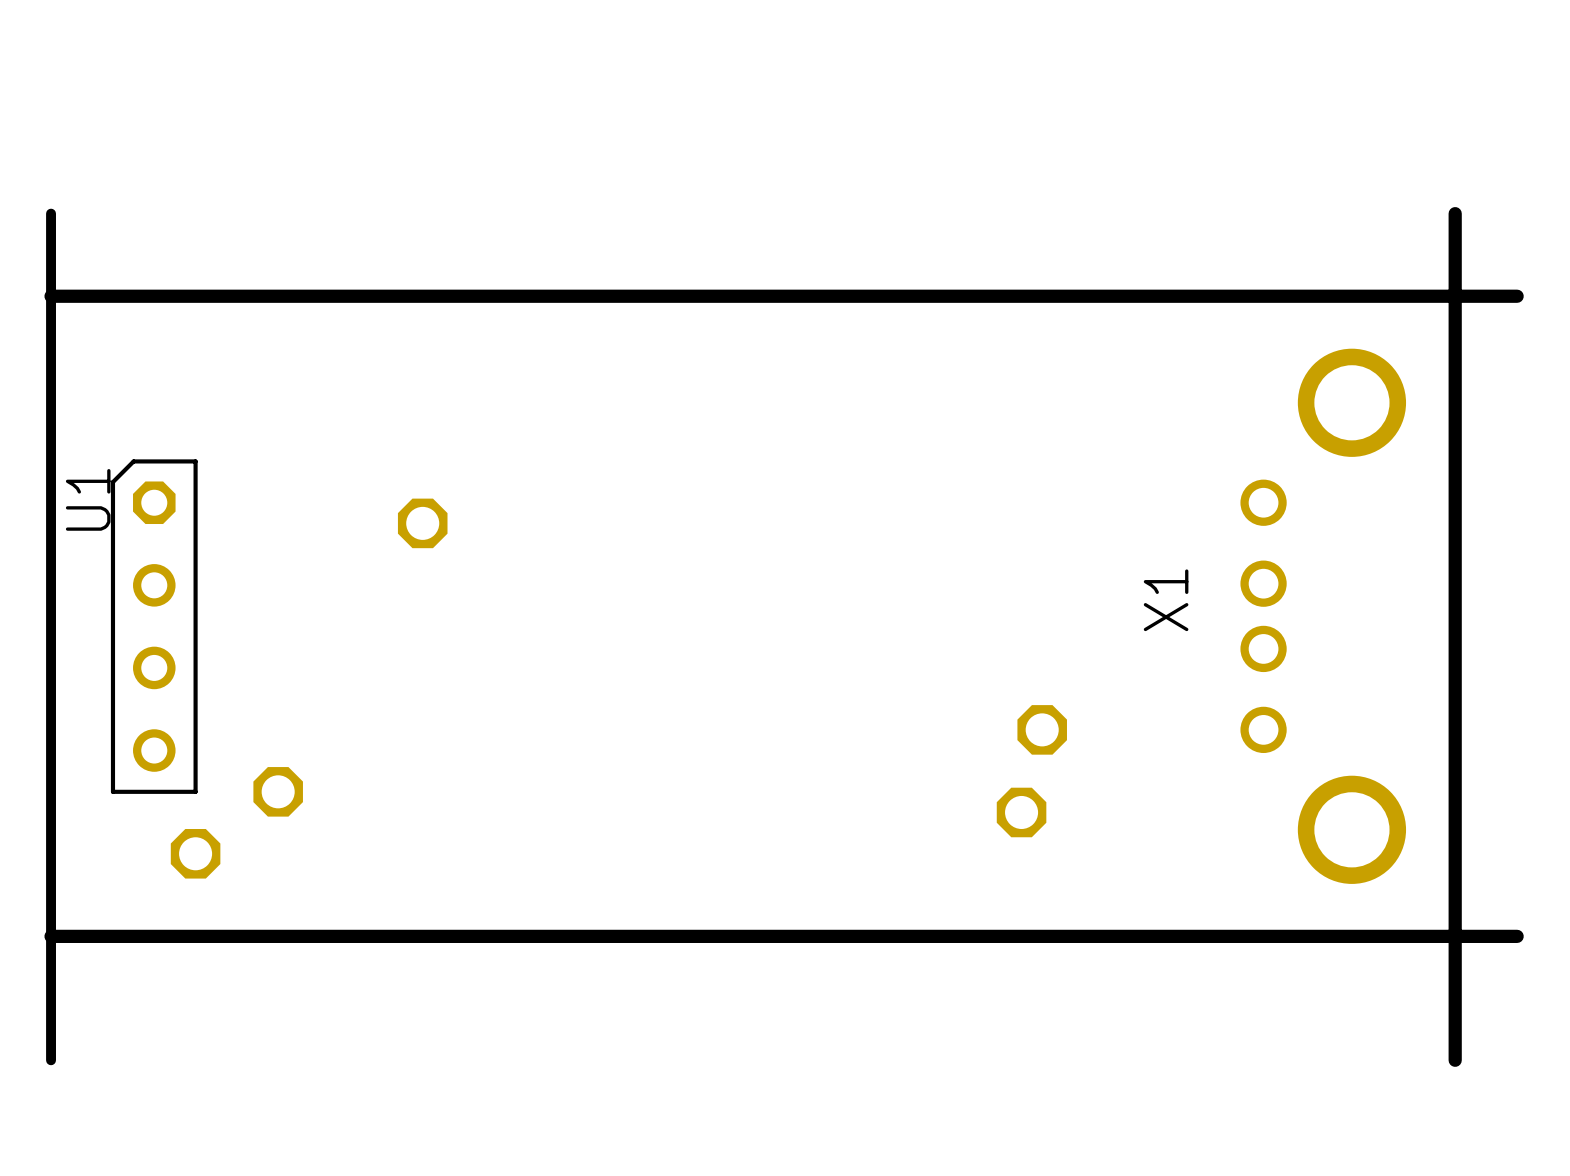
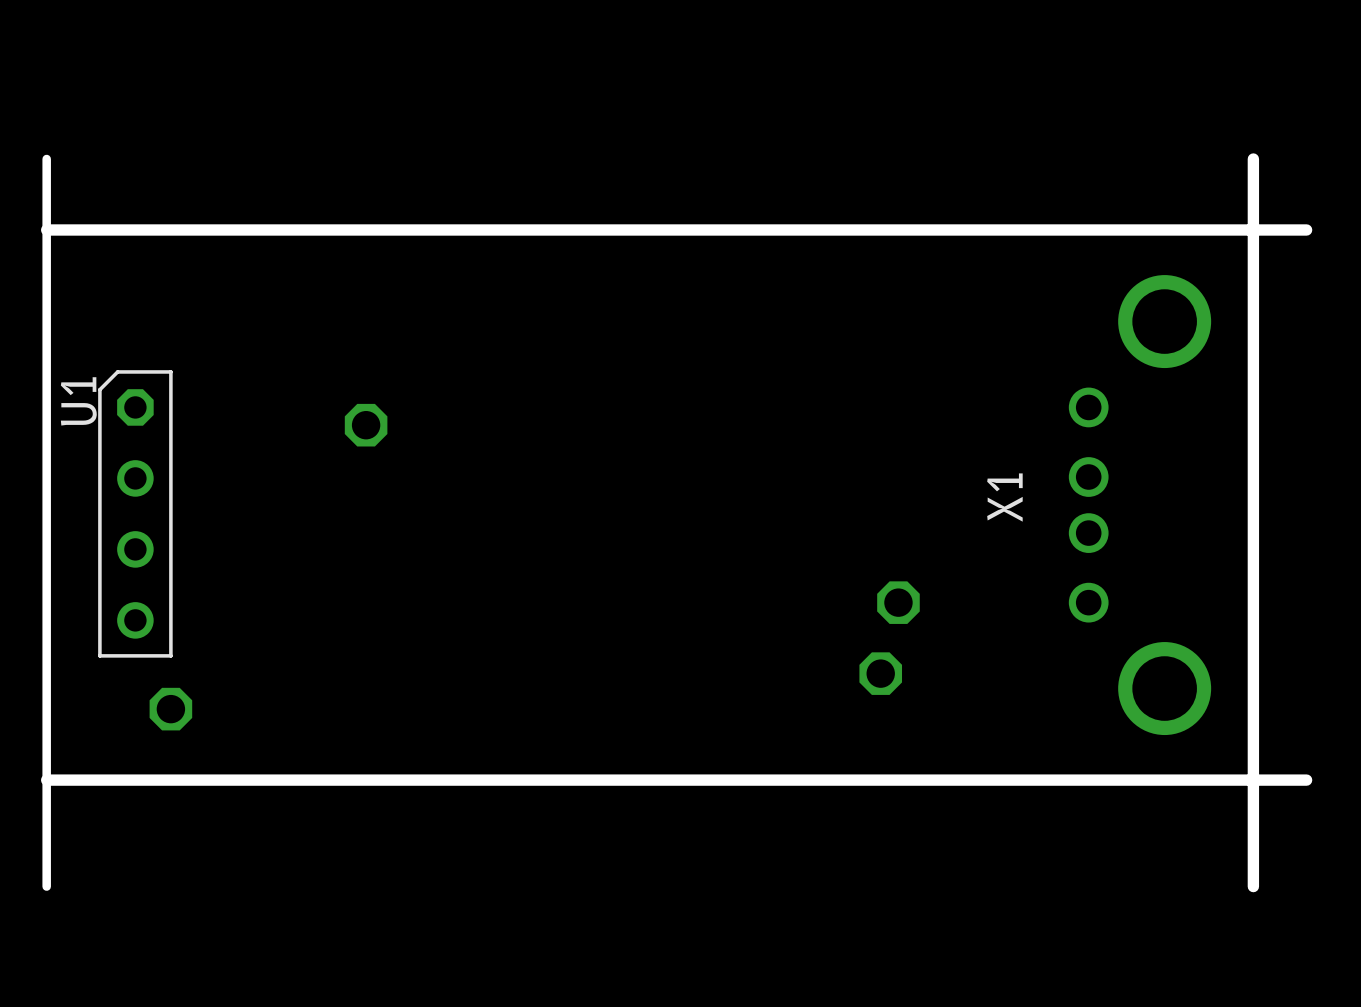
part: (278, 791) -> none

